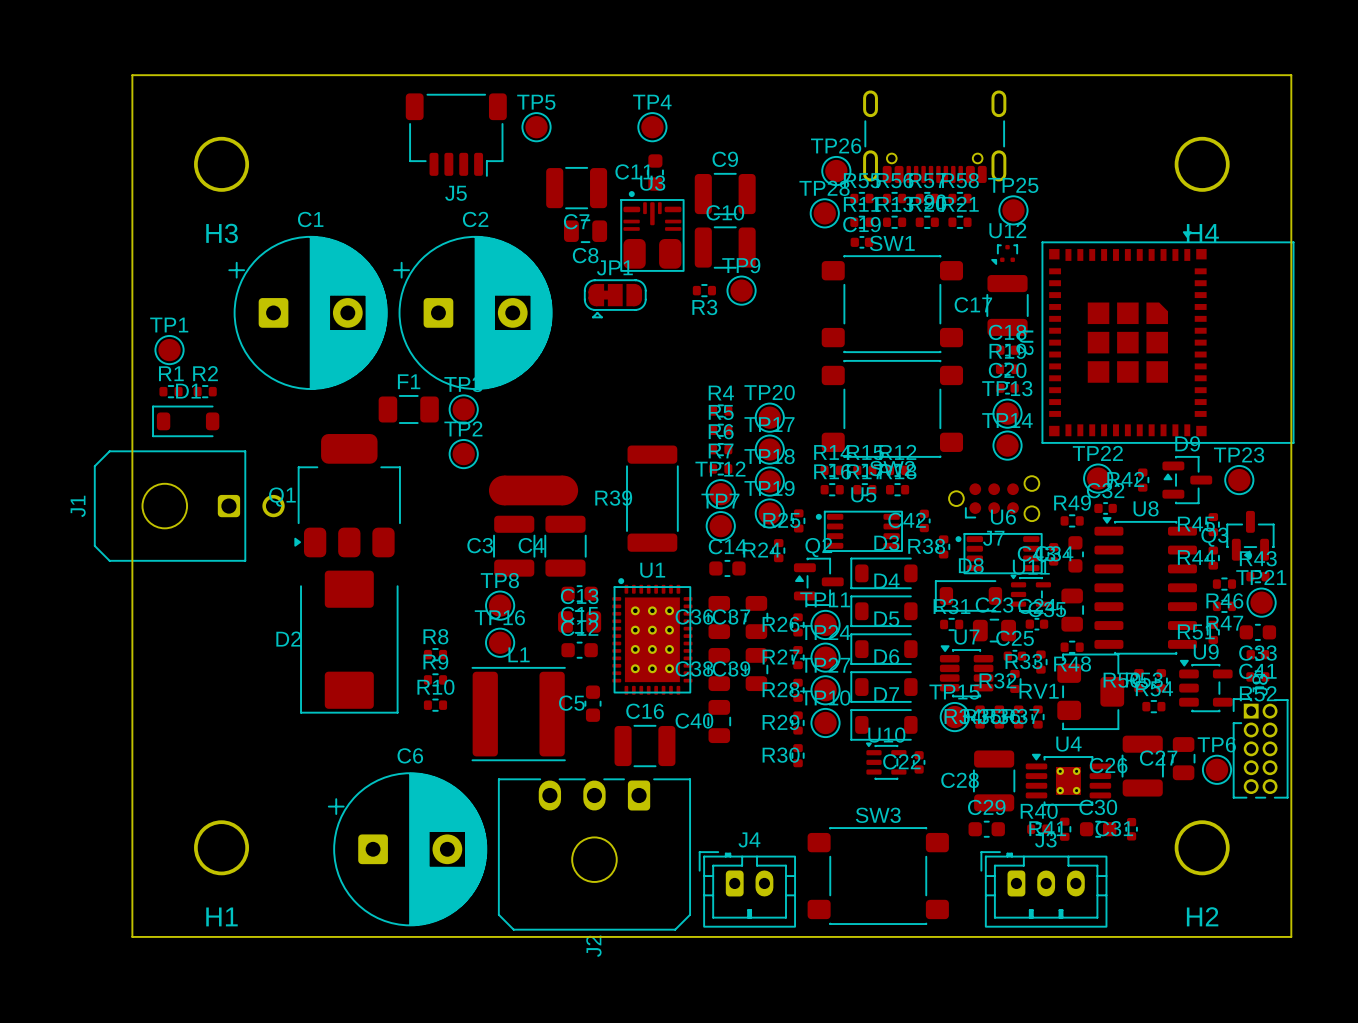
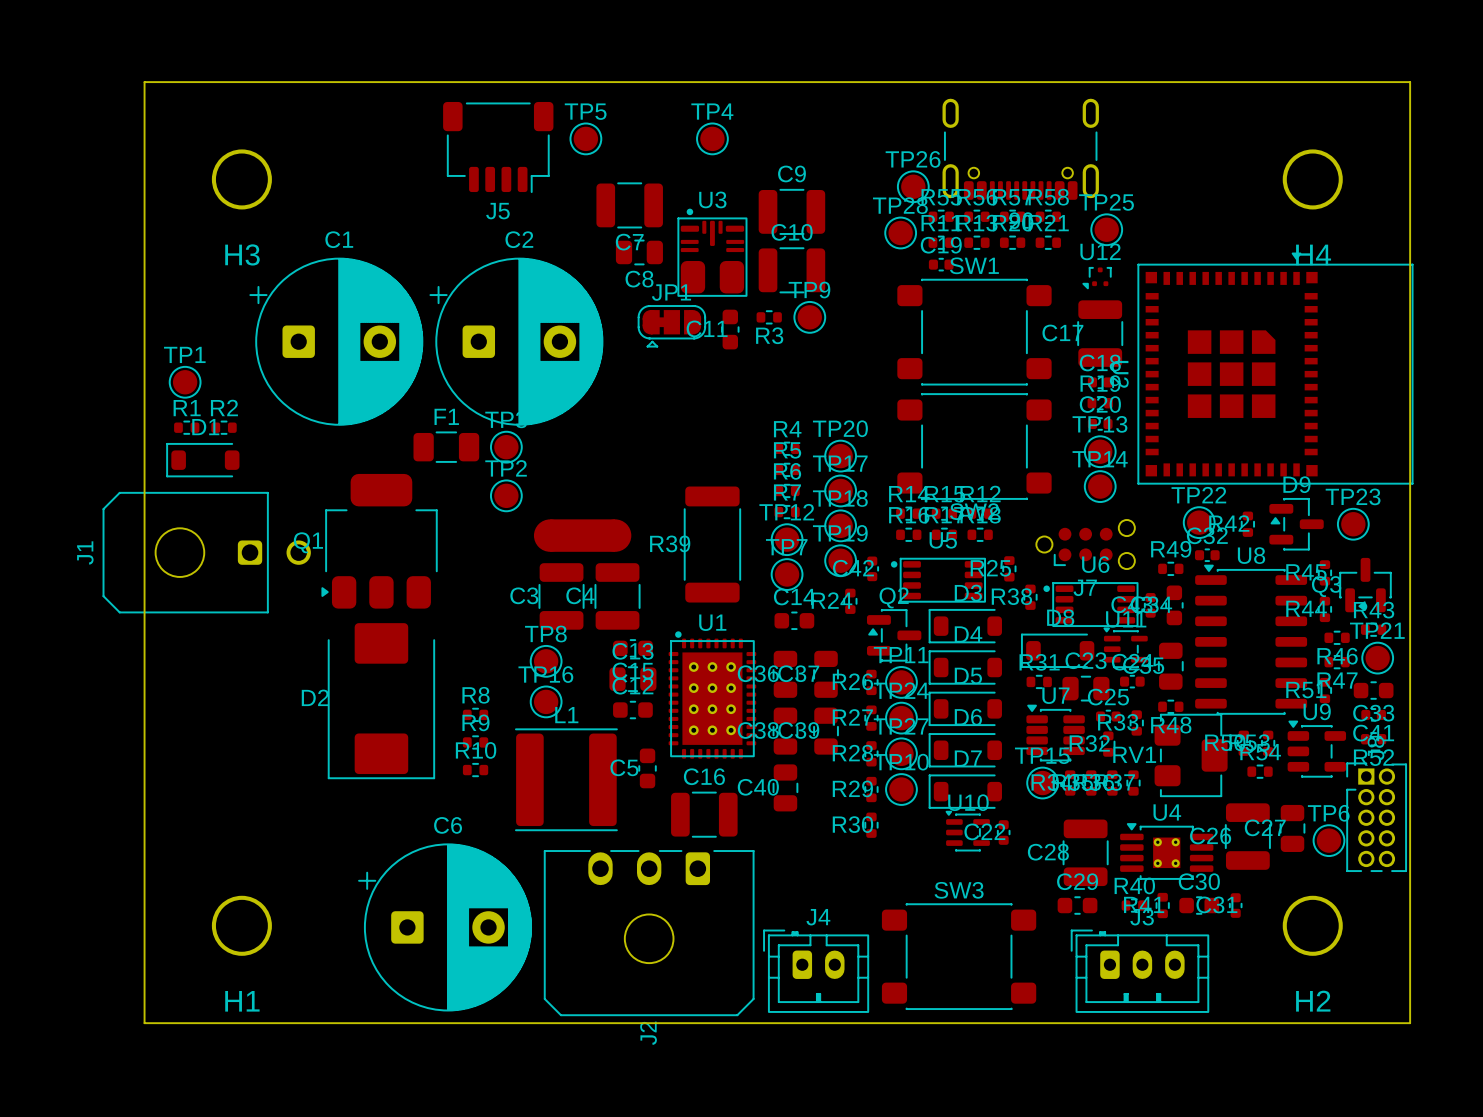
C11 position: (655, 172) -> (730, 329)
R25 position: (798, 520) -> (1009, 568)
C42 position: (924, 520) -> (872, 568)

